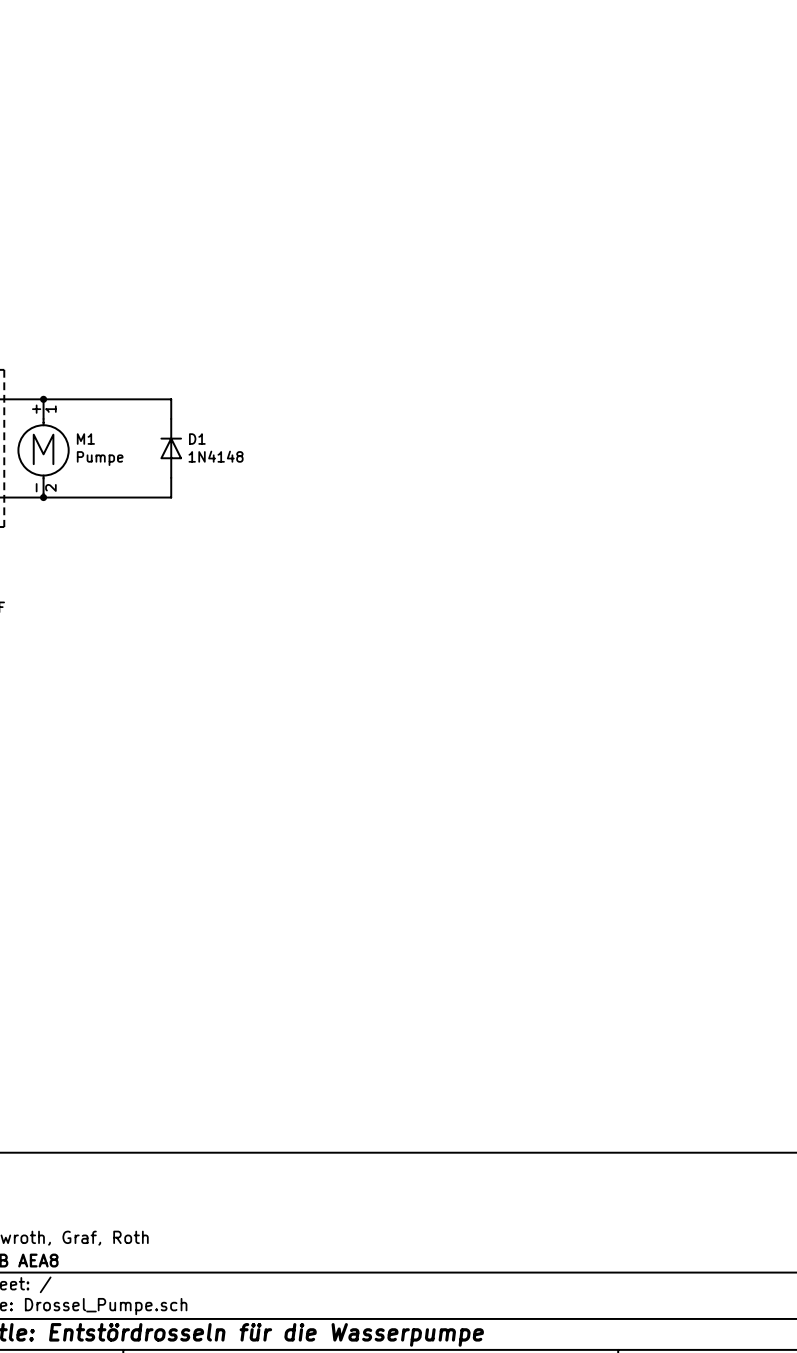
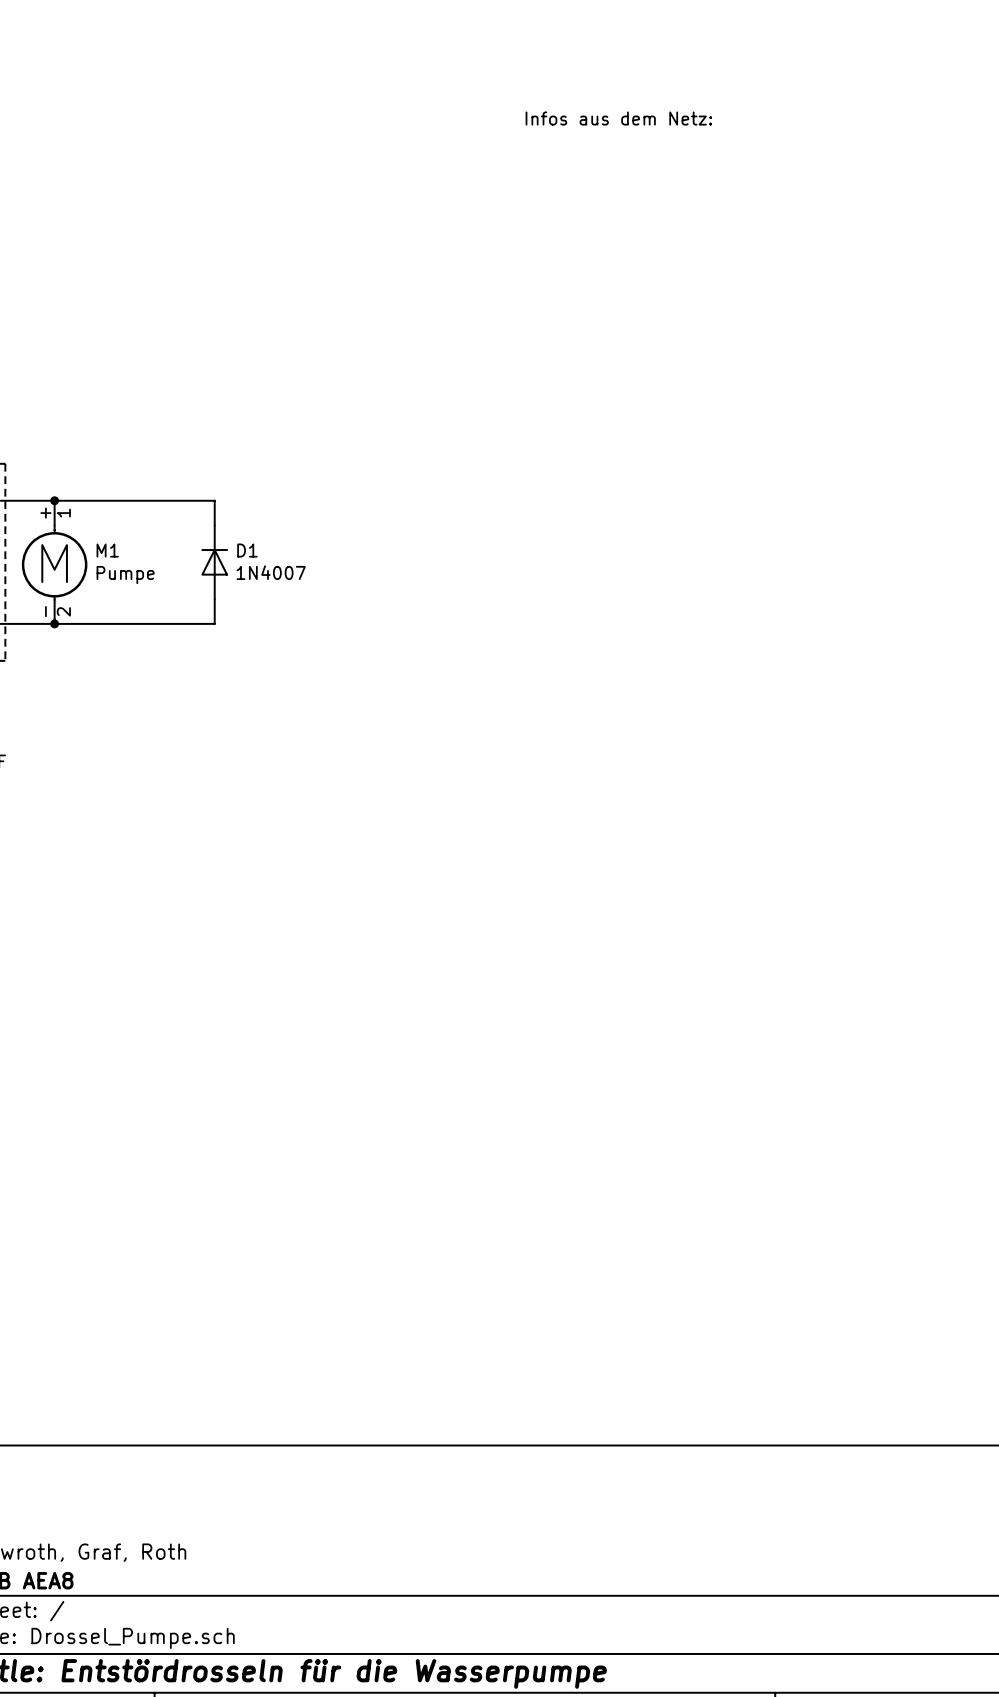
text: none -> Infos aus dem Netz: (618, 118)
D1 value: 1N4148 (216, 456) -> 1N4007 (271, 572)

